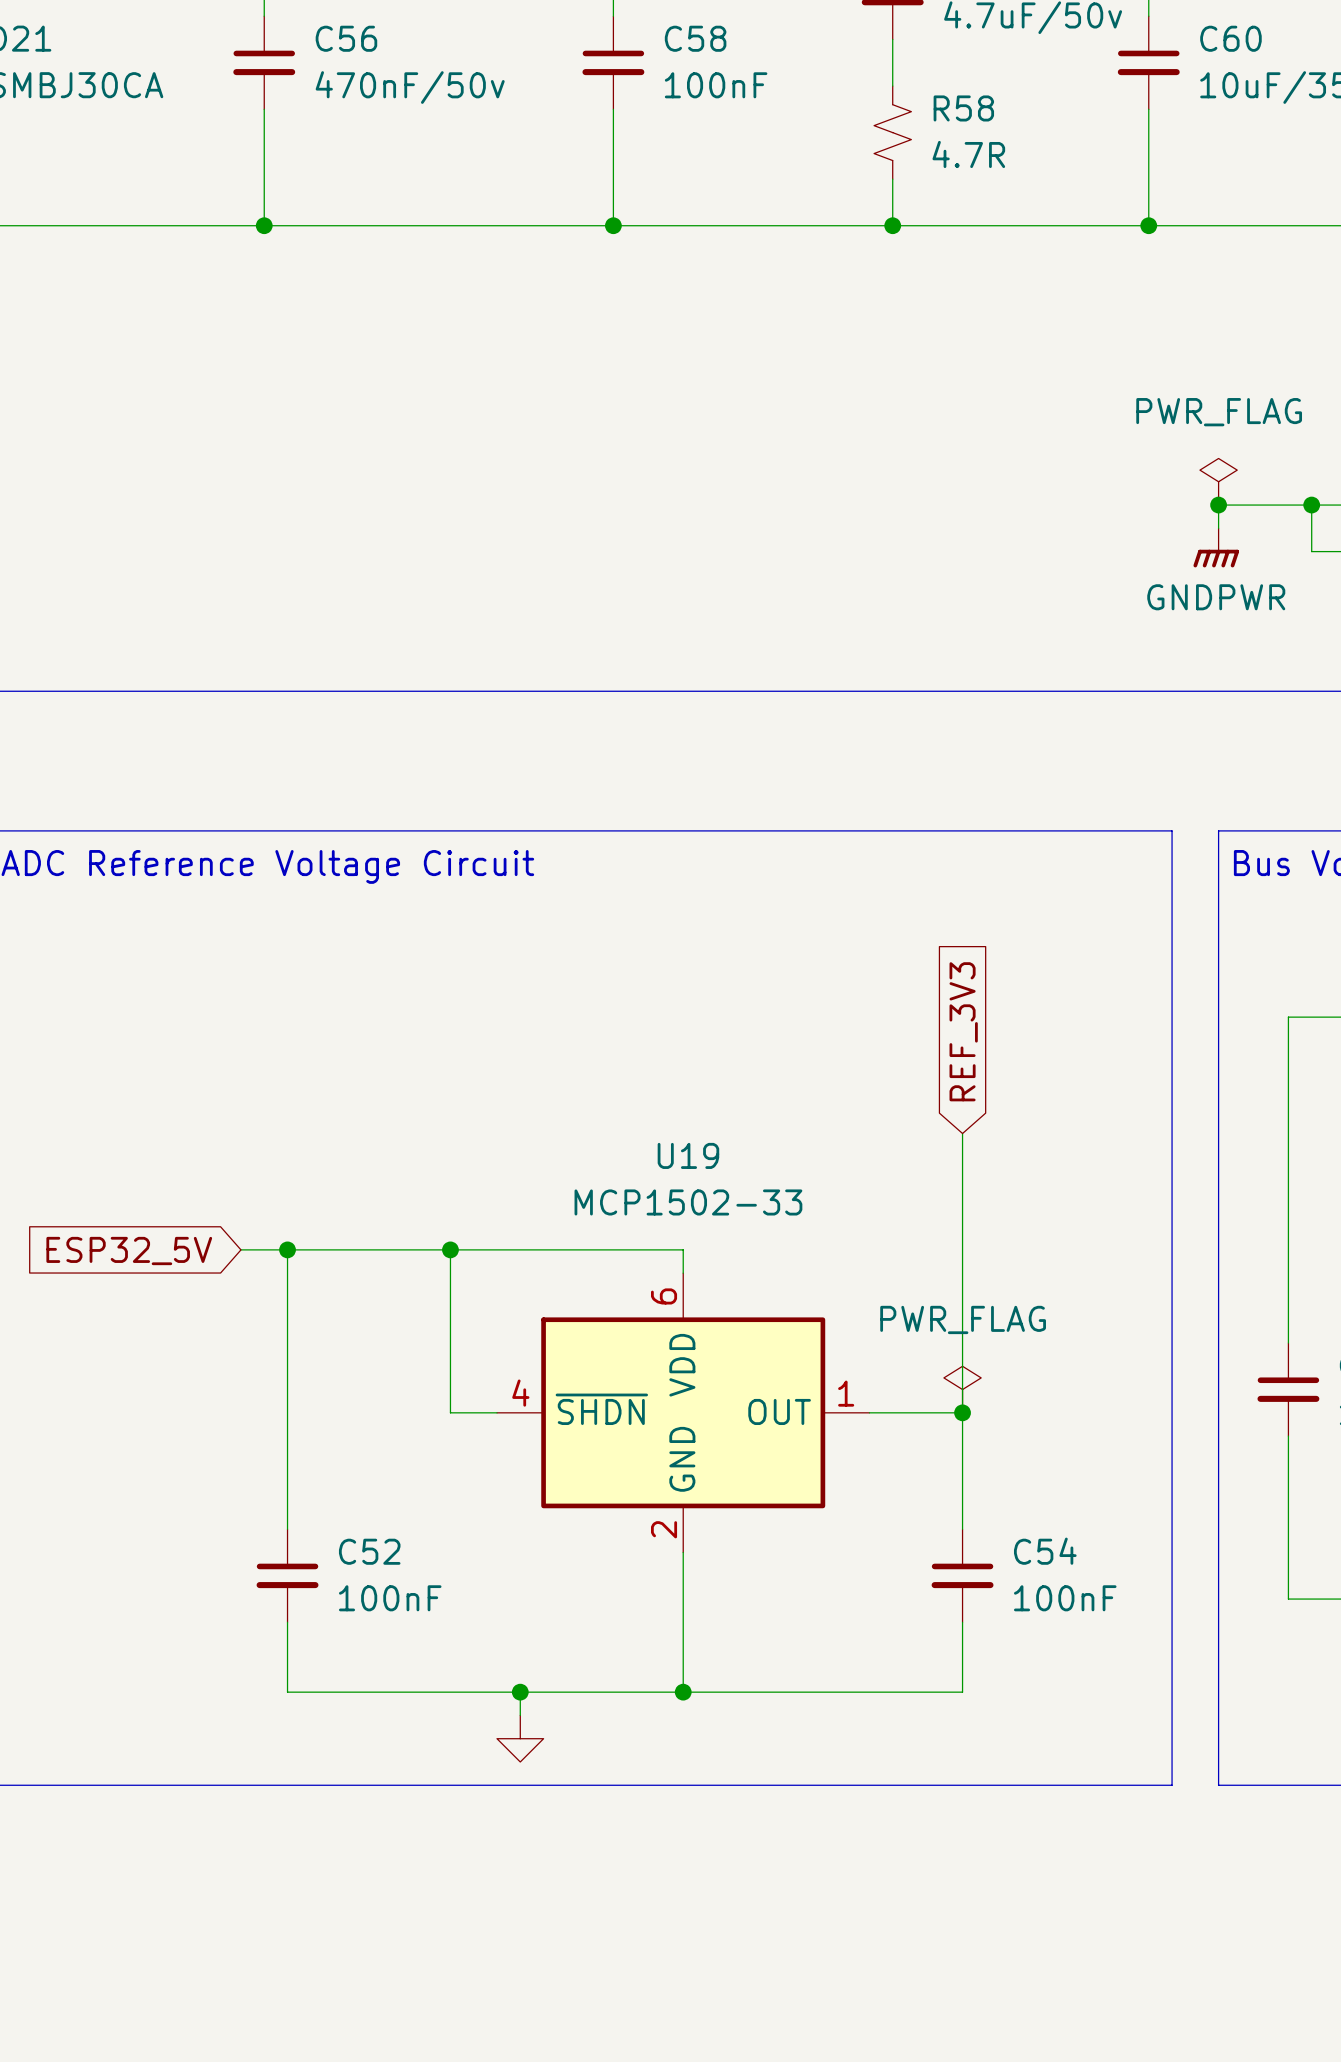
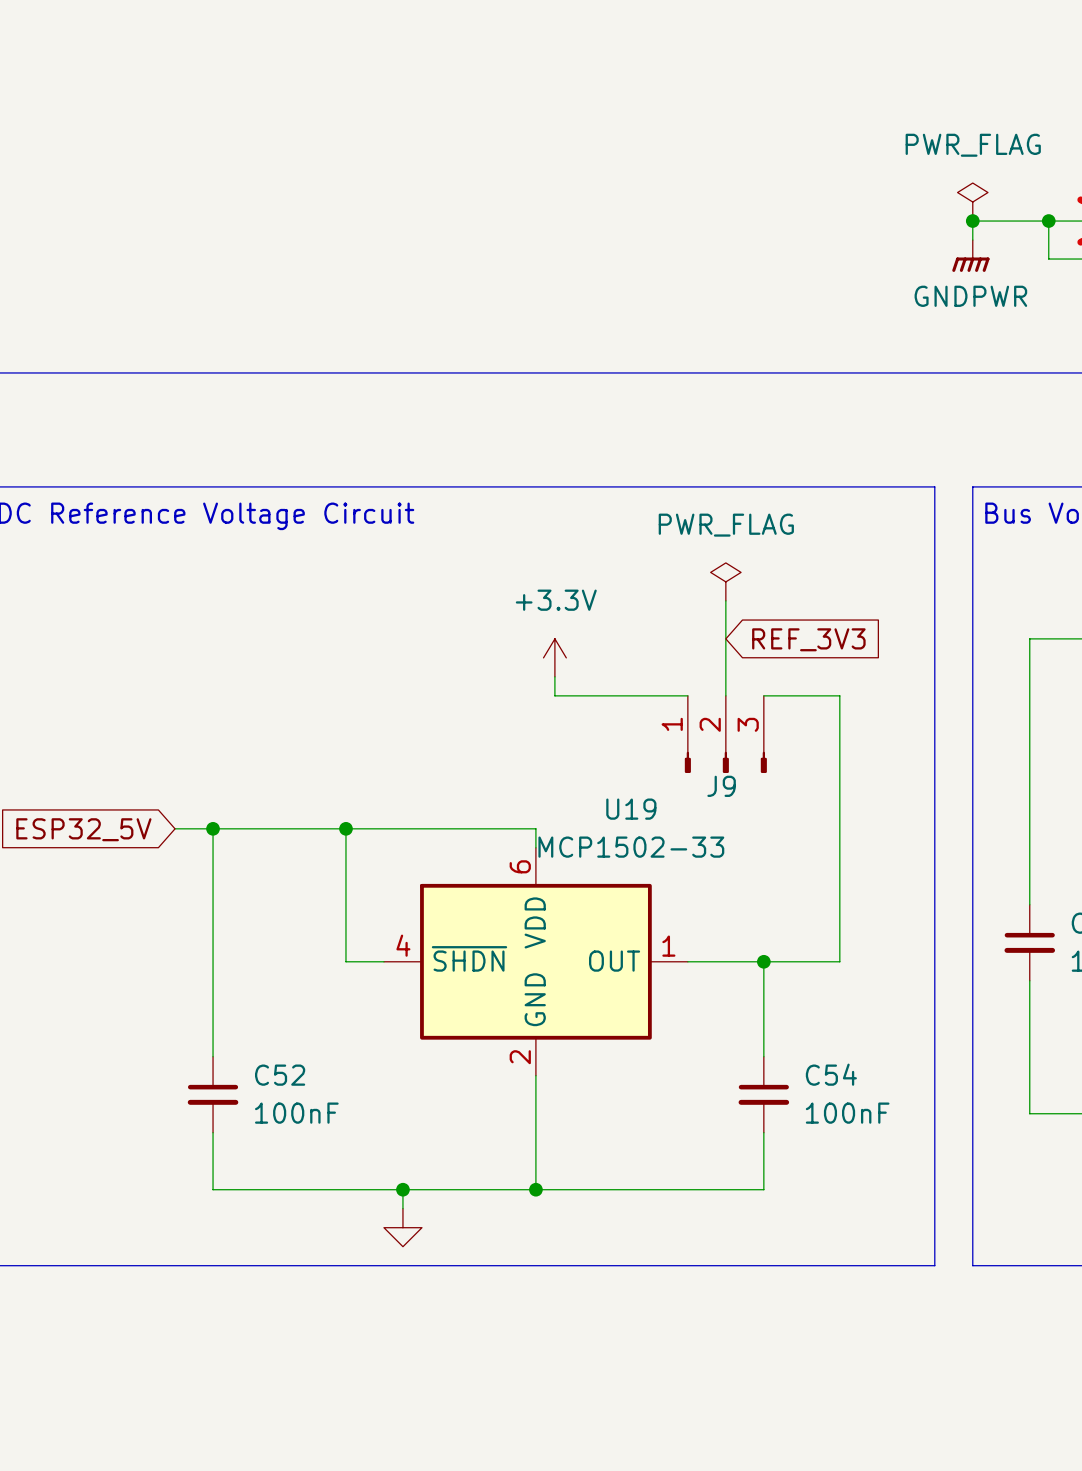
wire: none -> (725, 600) (725, 695)
global label rotation: 0° (963, 1031) -> 90° clockwise (808, 639)
power symbol: none -> +3.3V (554, 657)
wire: none -> (554, 676) (554, 695) (687, 695)
wire: (962, 1133) (962, 1412) -> (763, 695) (839, 695) (839, 961) (763, 961)
J9: none -> (725, 734)
U19 name position: U19 (688, 1155) -> U19 (631, 809)
U19 value position: MCP1502-33 (688, 1202) -> MCP1502-33 (631, 847)
power symbol position: PWR_FLAG (962, 1389) -> PWR_FLAG (725, 581)

